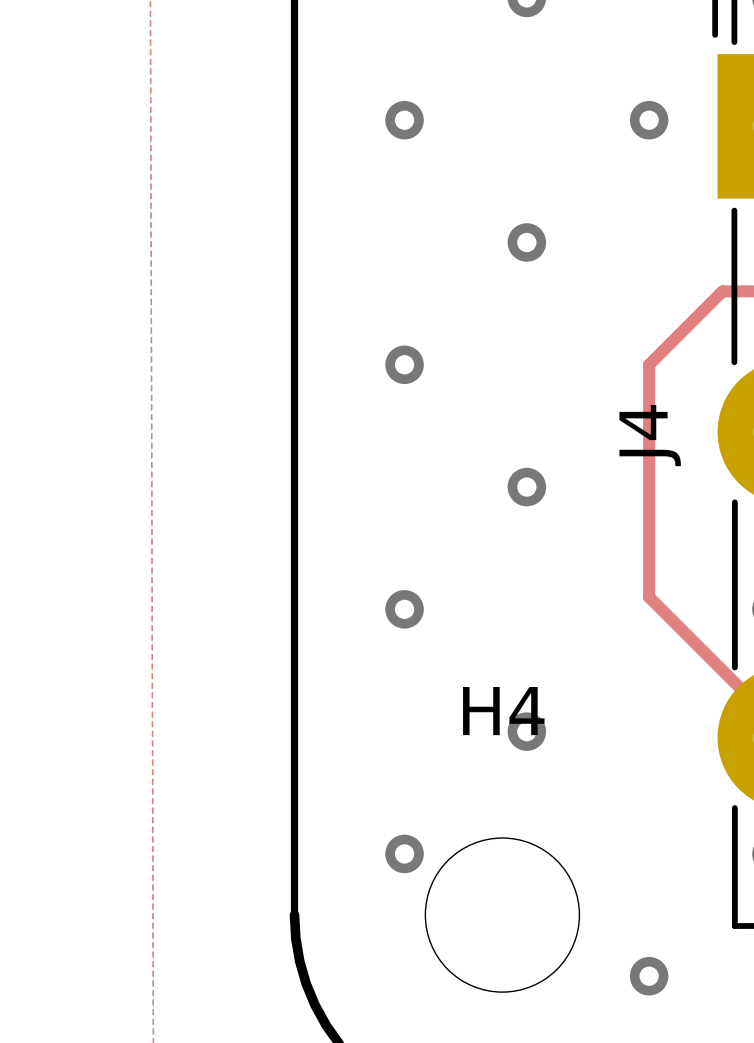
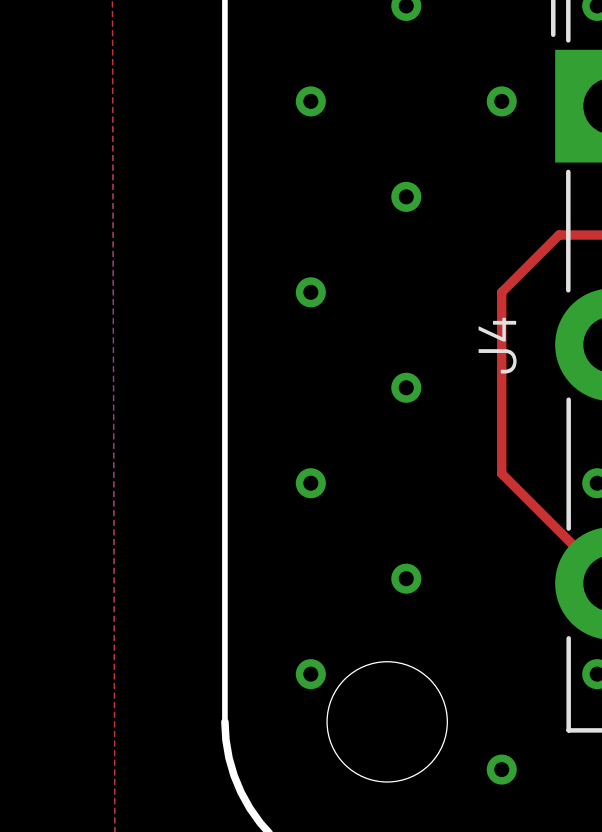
H4 name: H4 (503, 711) -> none

